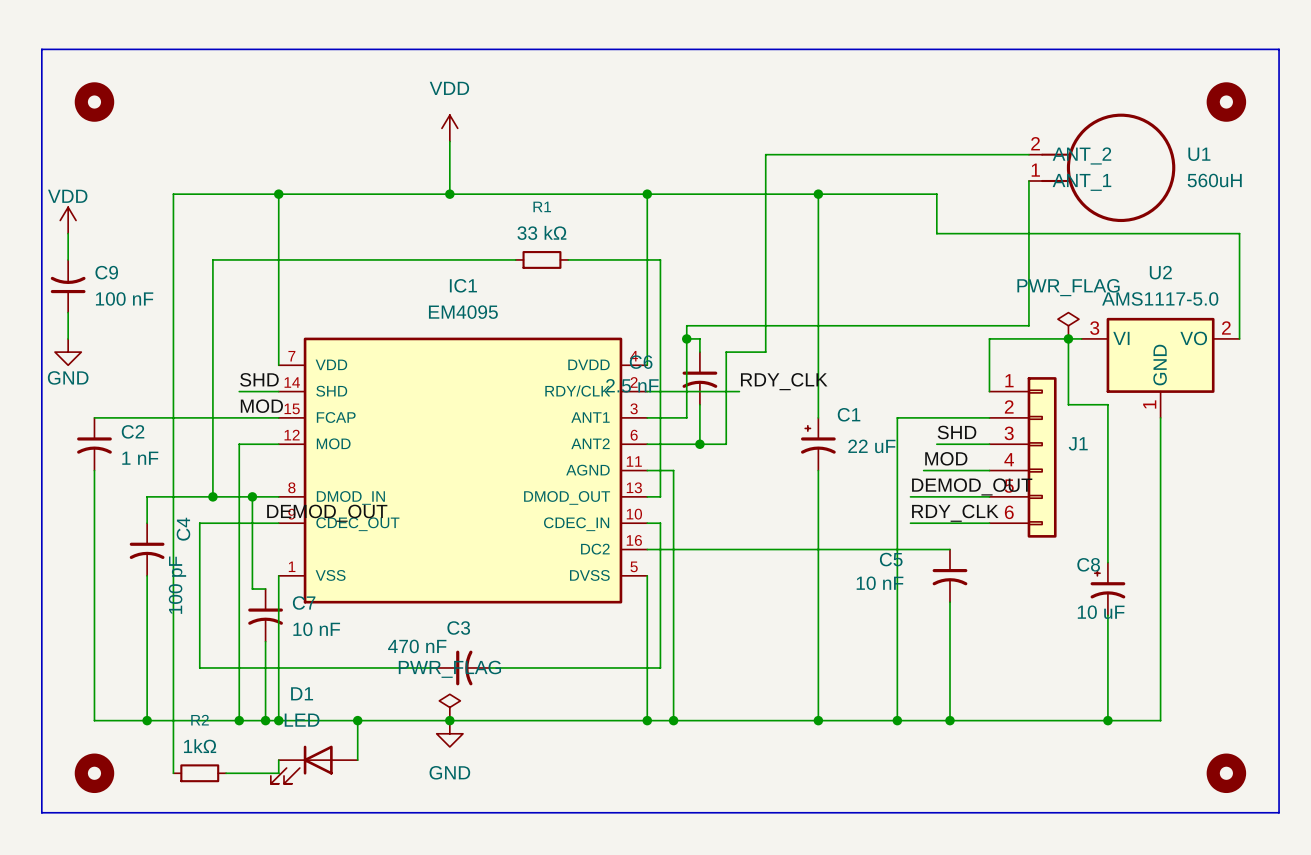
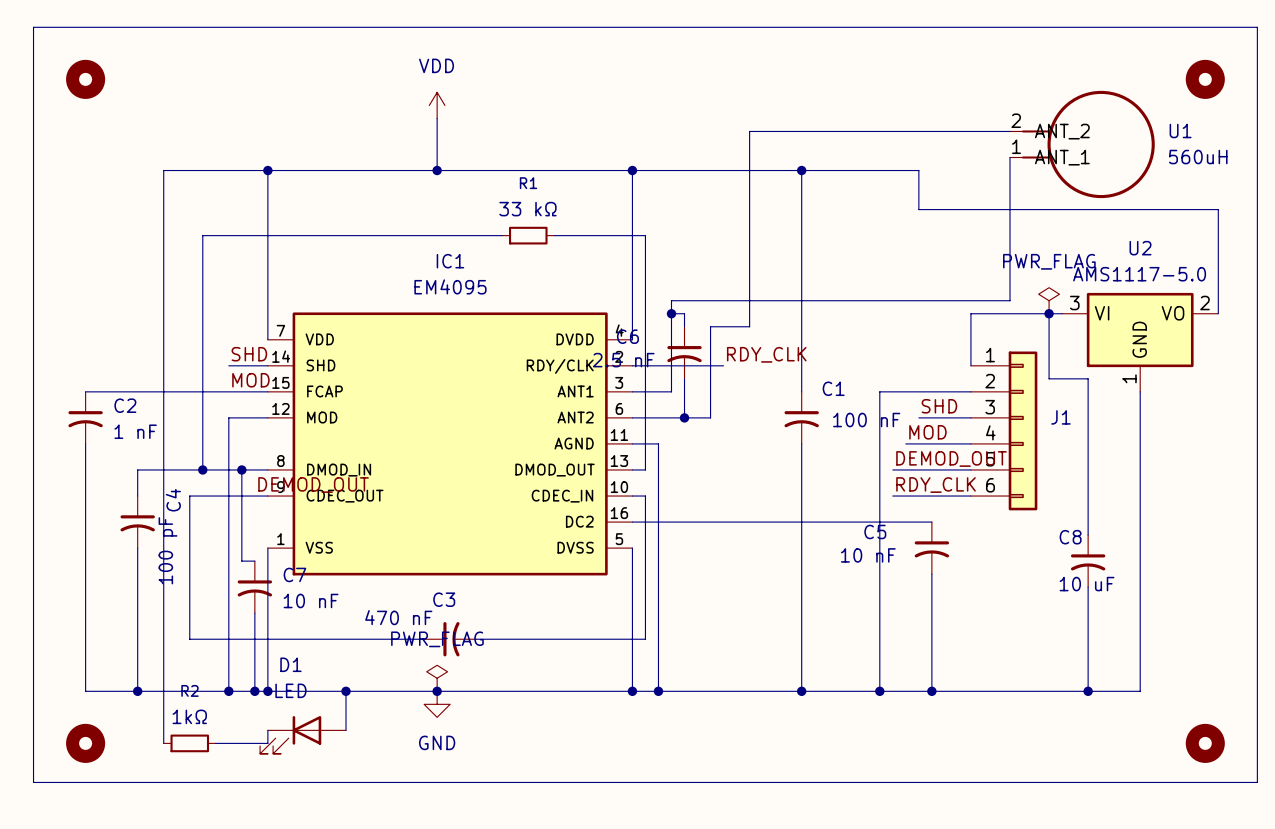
power symbol: VDD (68, 220) -> none
wire: (68, 233) (68, 259) -> none
C9: 100 nF (68, 286) -> none
wire: (68, 312) (68, 338) -> none
power symbol: GND (68, 352) -> none
C1 symbol: [801, 417, 836, 471] -> [784, 391, 819, 444]
C1 value: 22 uF (871, 446) -> 100 nF (866, 420)
C8 symbol: [1090, 562, 1126, 616] -> [1070, 535, 1106, 588]

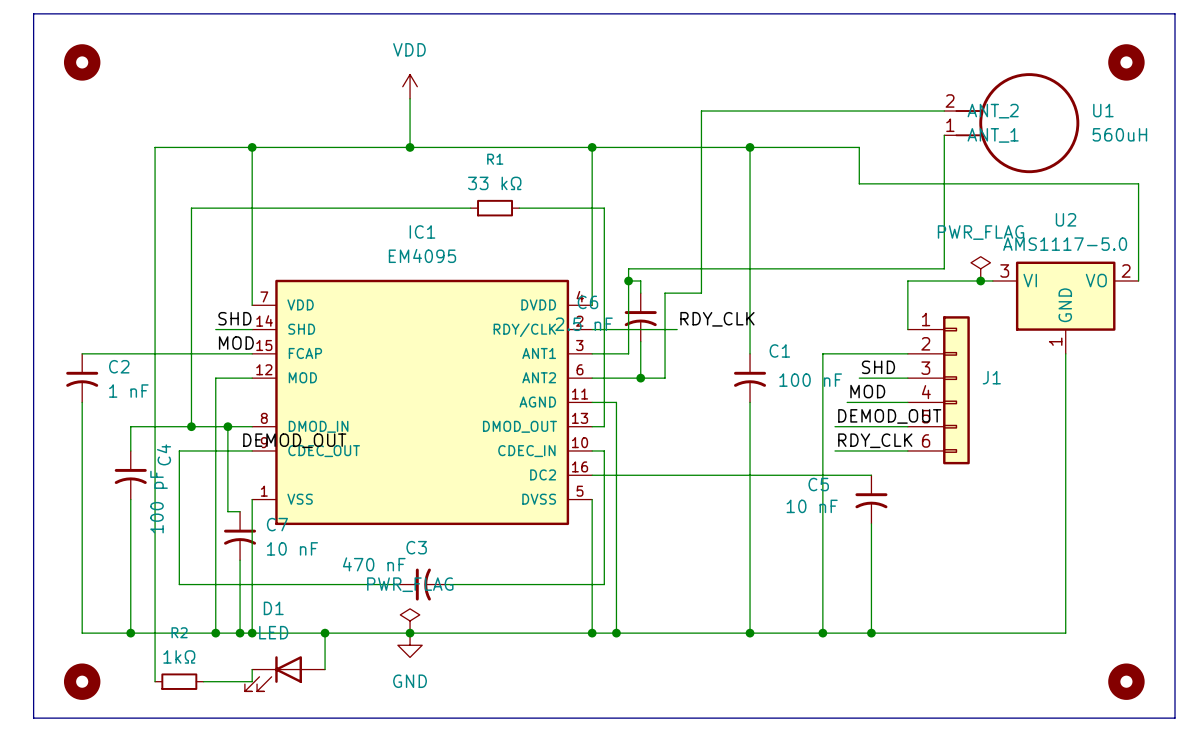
wire: (1049, 313) (1049, 378) (1088, 378) (1088, 535) -> none
C8: 10 uF (1088, 561) -> none
wire: (1088, 587) (1088, 691) -> none
junction: (1088, 691) -> none

